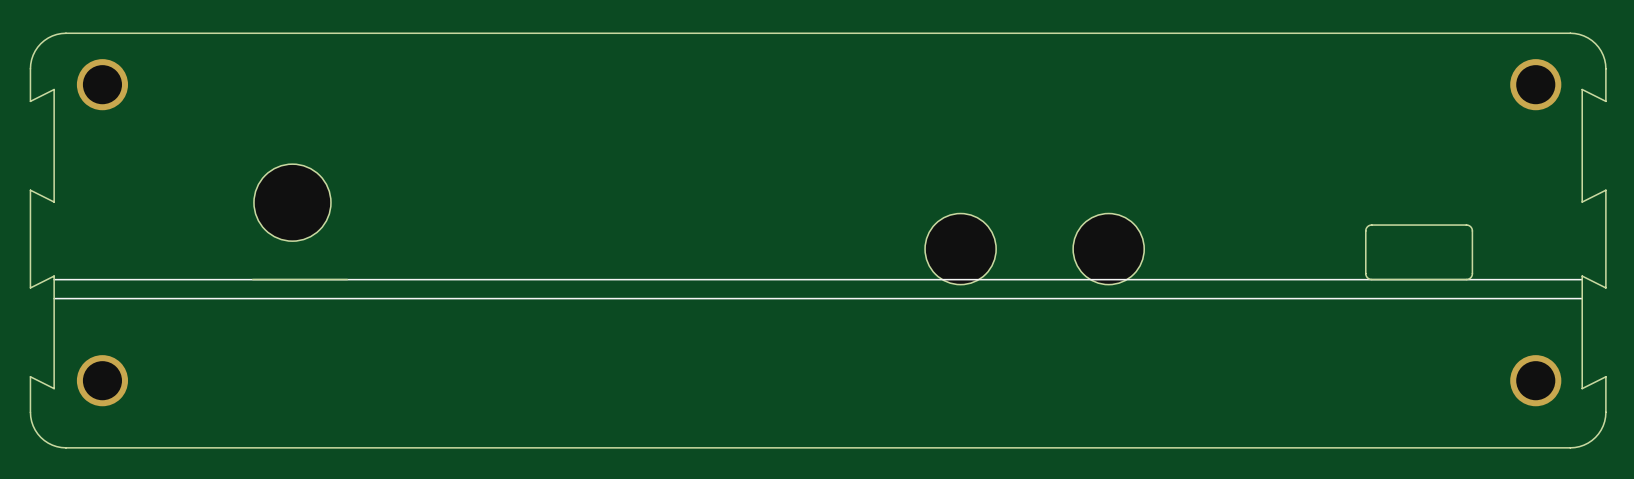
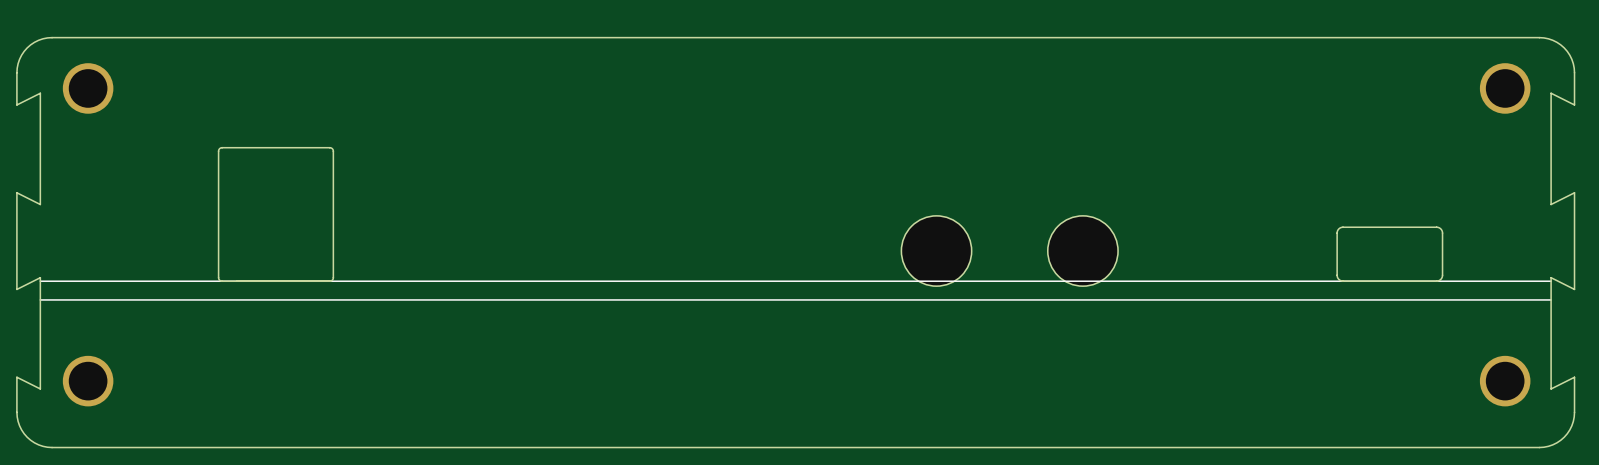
board edge: none -> (329, 147) (219, 149) (219, 280) (332, 279) (333, 151) (329, 147)
hole: (292, 202) -> none

